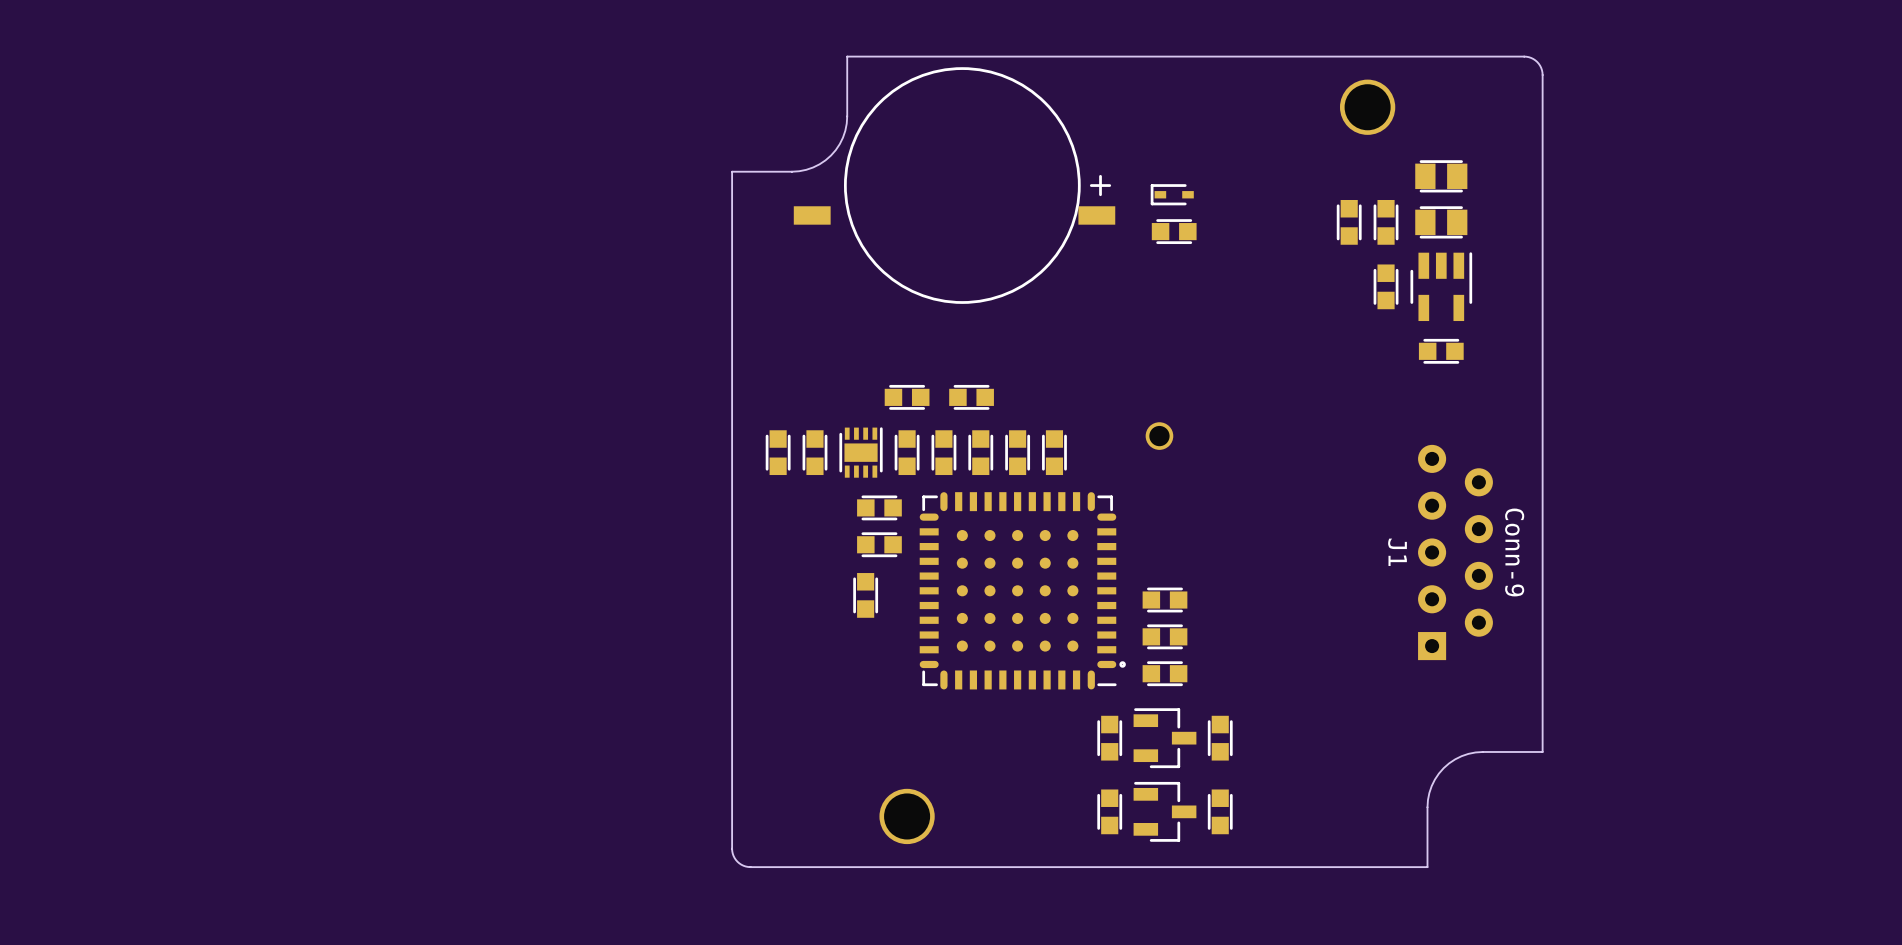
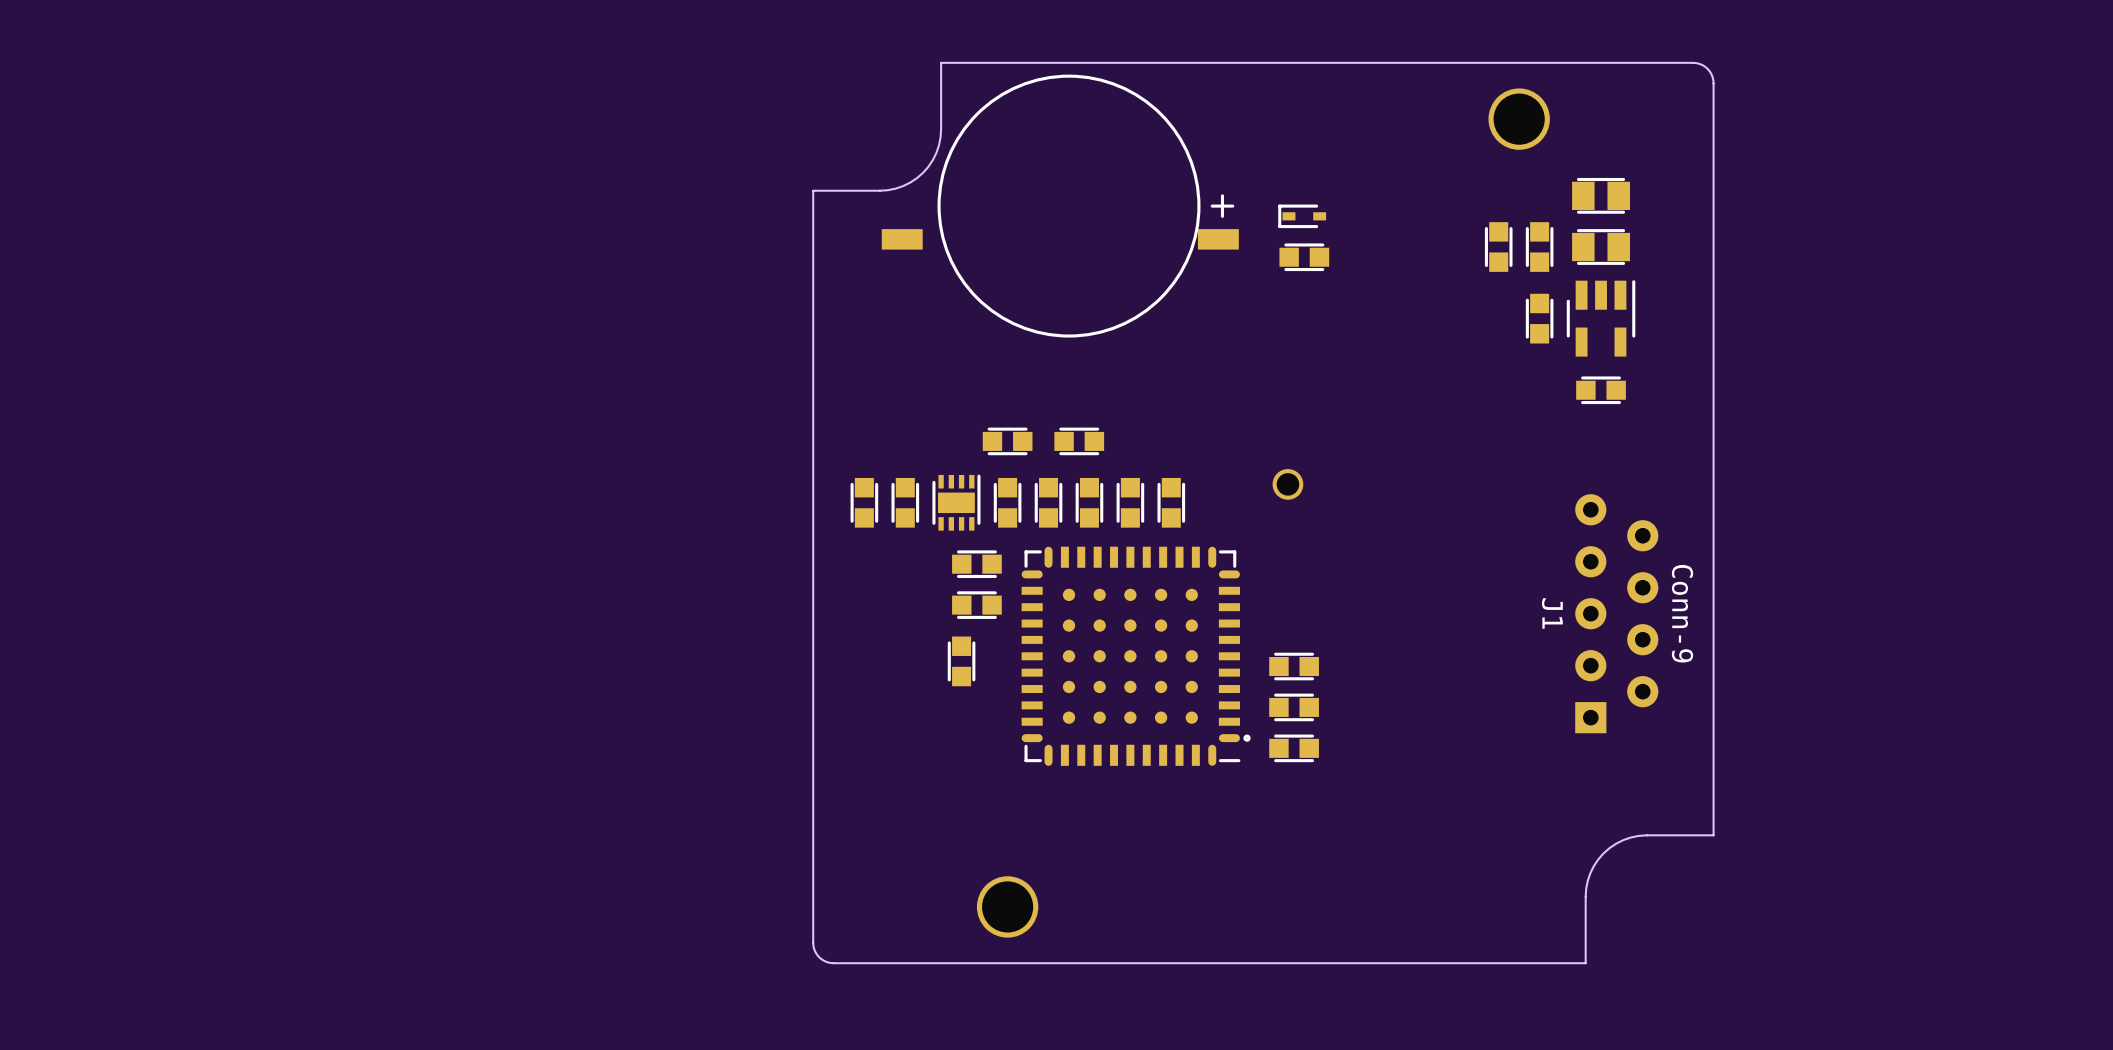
part: (1109, 738) -> none
part: (1164, 738) -> none
part: (1220, 738) -> none
part: (1109, 811) -> none
part: (1164, 811) -> none
part: (1220, 811) -> none

